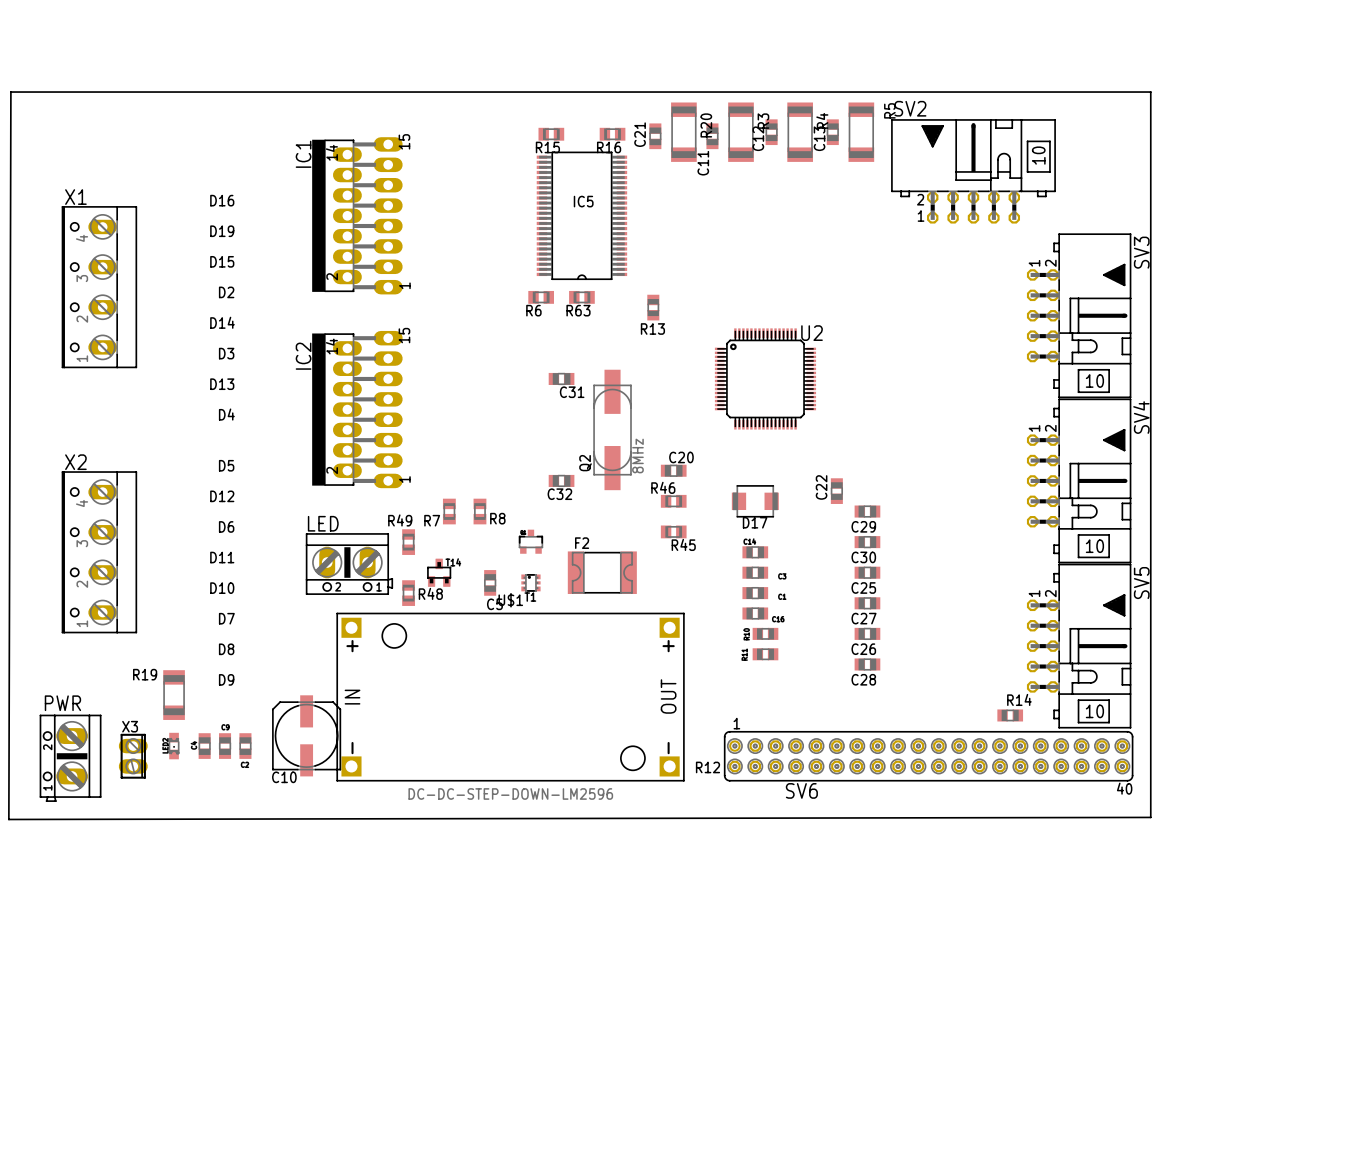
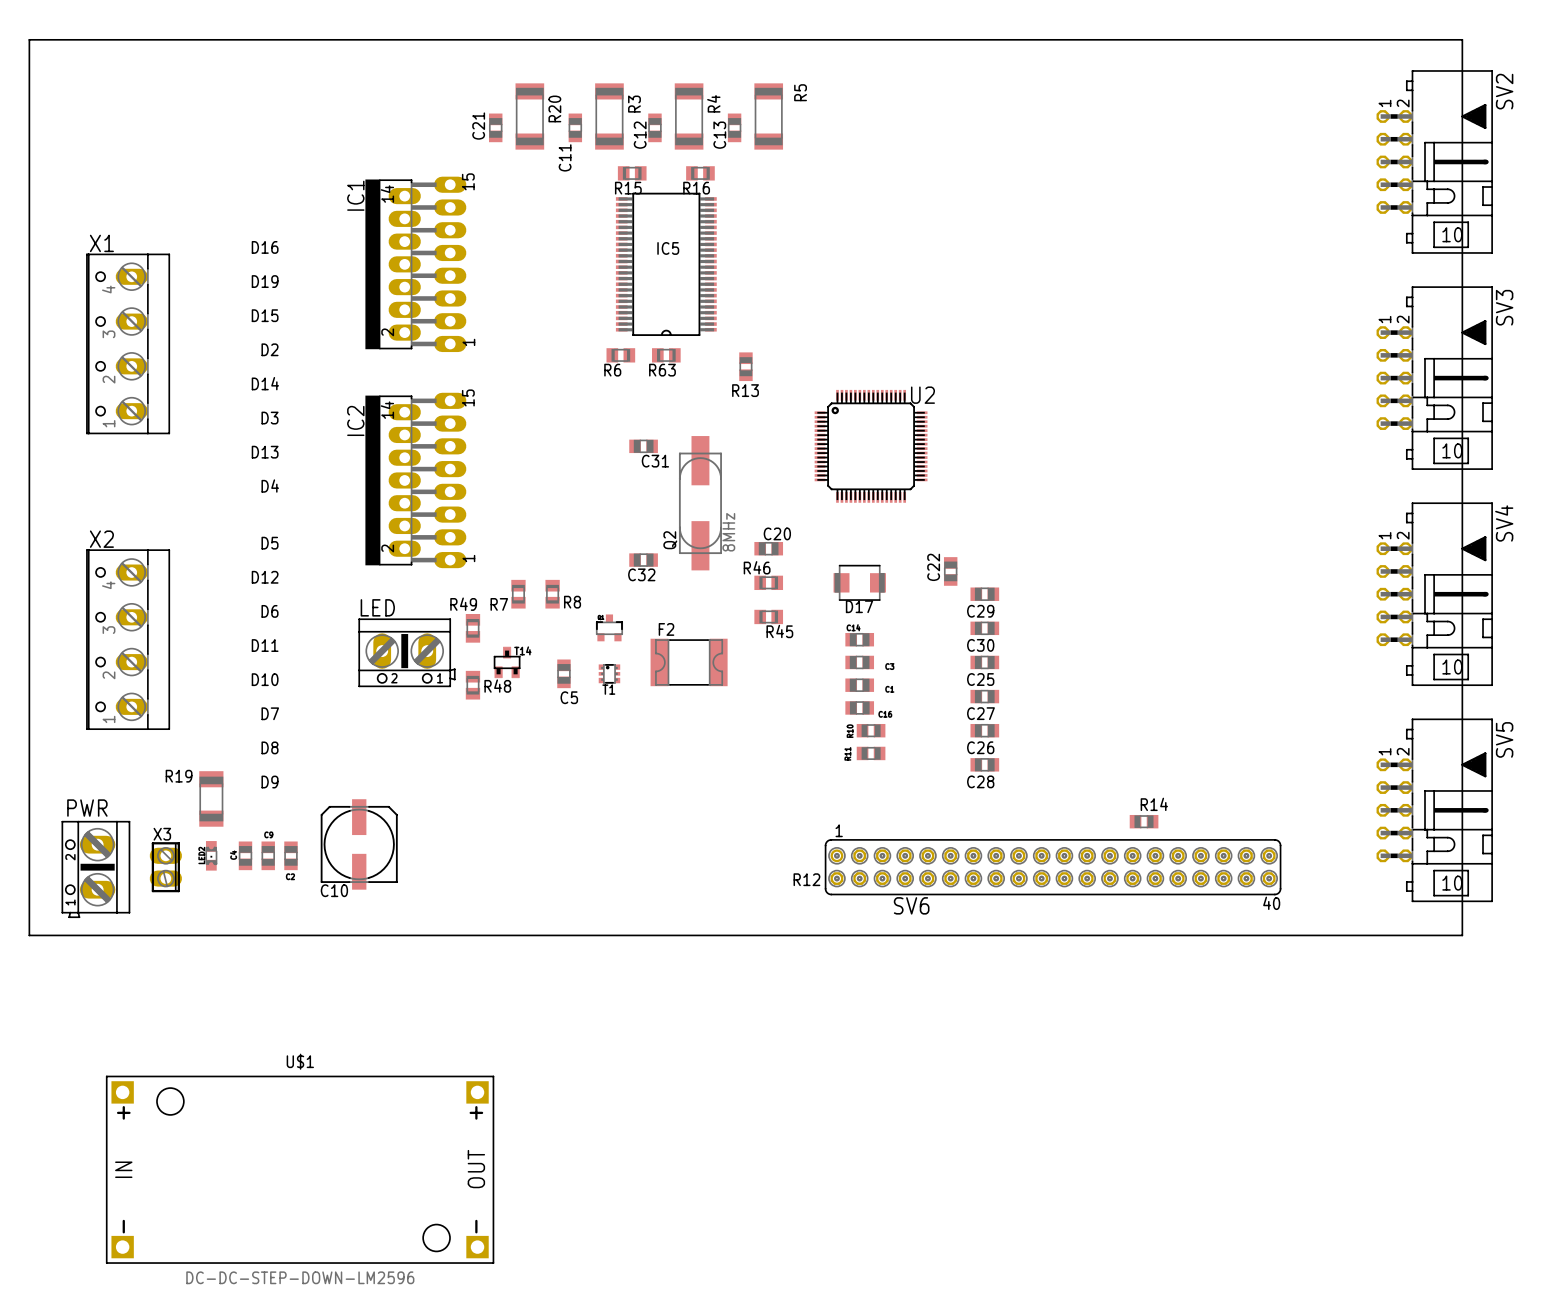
board edge: (10, 92) (1150, 92) (1150, 817) (8, 819) (10, 92) -> (29, 39) (29, 935) (1462, 935) (1462, 39) (29, 39)
SV2 name position: SV2 (910, 108) -> SV2 (1504, 91)
SV2 footprint: [891, 119, 1056, 224] -> [1376, 70, 1493, 254]
R20 position: (683, 132) -> (529, 116)
R3 position: (741, 132) -> (609, 116)
C12 position: (771, 132) -> (654, 127)
R4 position: (800, 132) -> (689, 116)
C13 position: (832, 132) -> (734, 127)
R5 position: (861, 132) -> (768, 116)
C21 position: (655, 136) -> (495, 127)
C11 position: (712, 136) -> (575, 127)
SV3 position: (1078, 315) -> (1434, 378)
SV4 position: (1078, 480) -> (1434, 594)
SV5 position: (1078, 646) -> (1434, 810)
U$1 position: (510, 697) -> (300, 1169)

